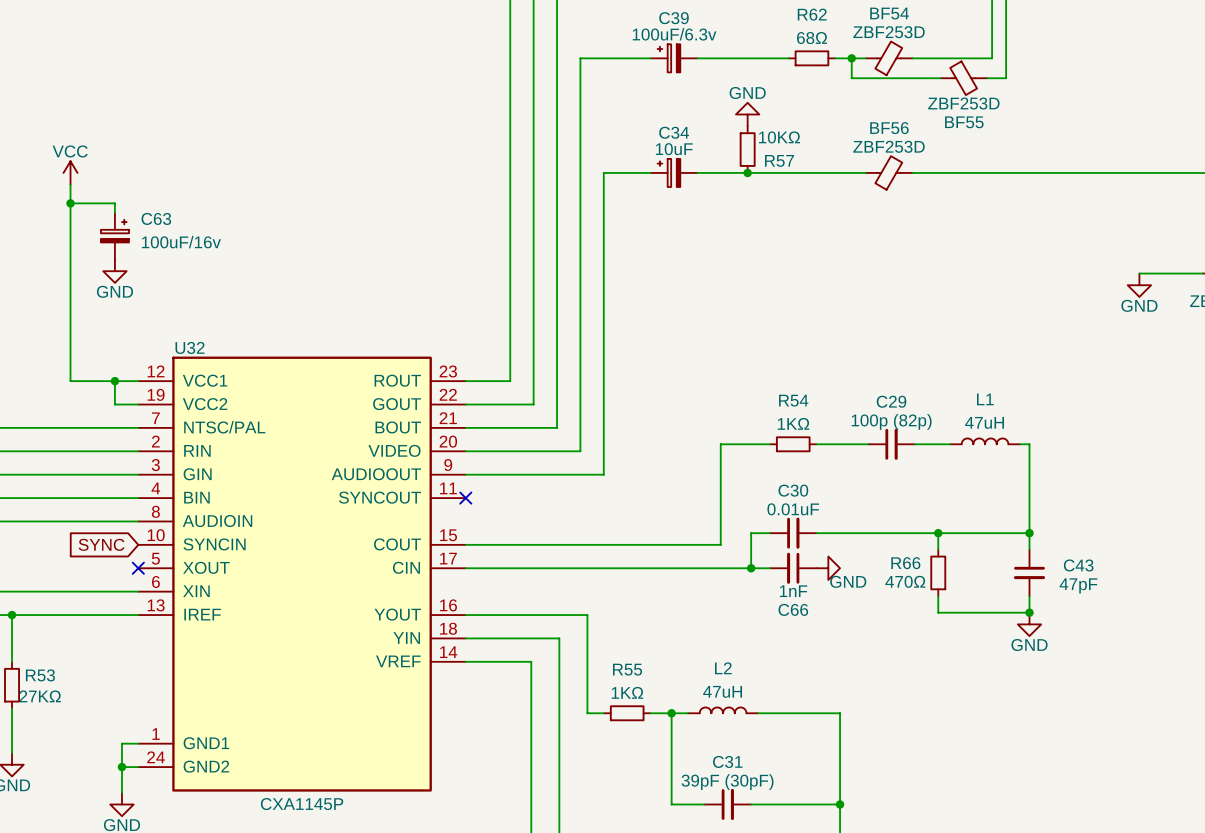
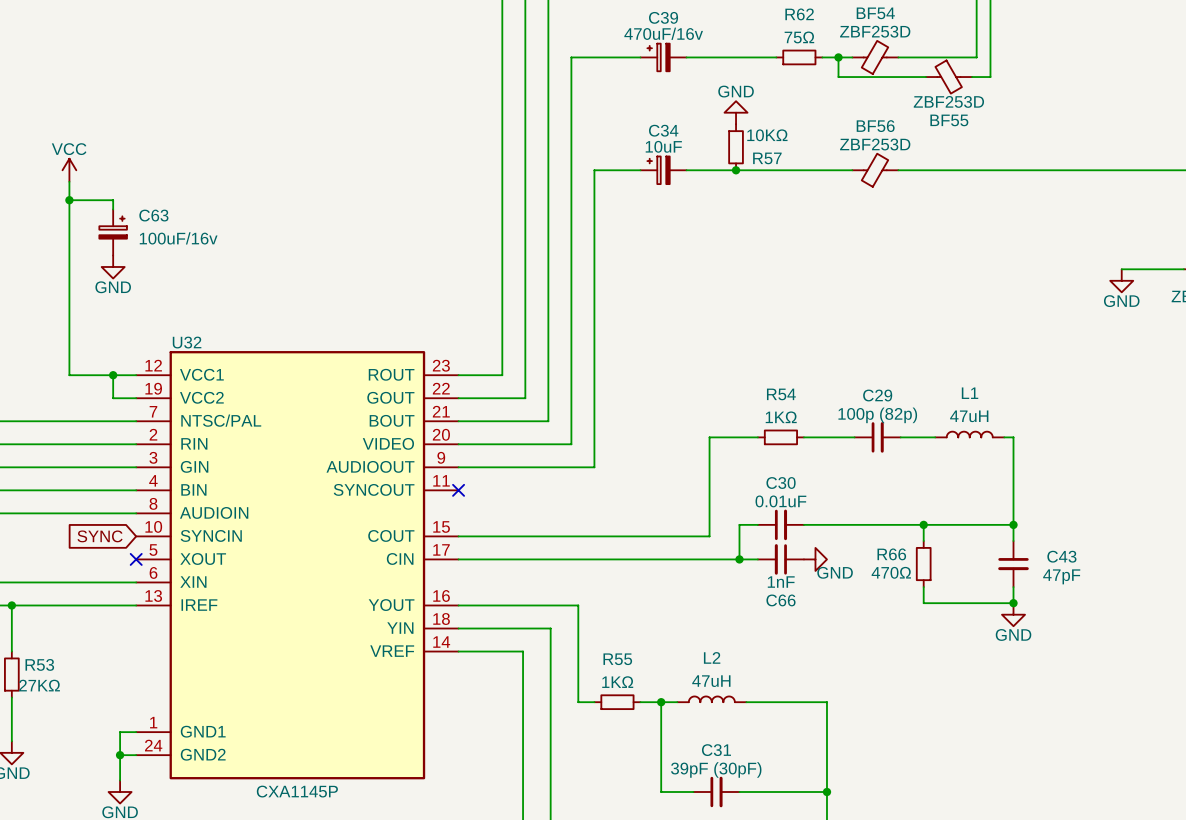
C39 value: 100uF/6.3v (674, 34) -> 470uF/16v (663, 33)
R62 value: 68Ω (812, 38) -> 75Ω (799, 37)

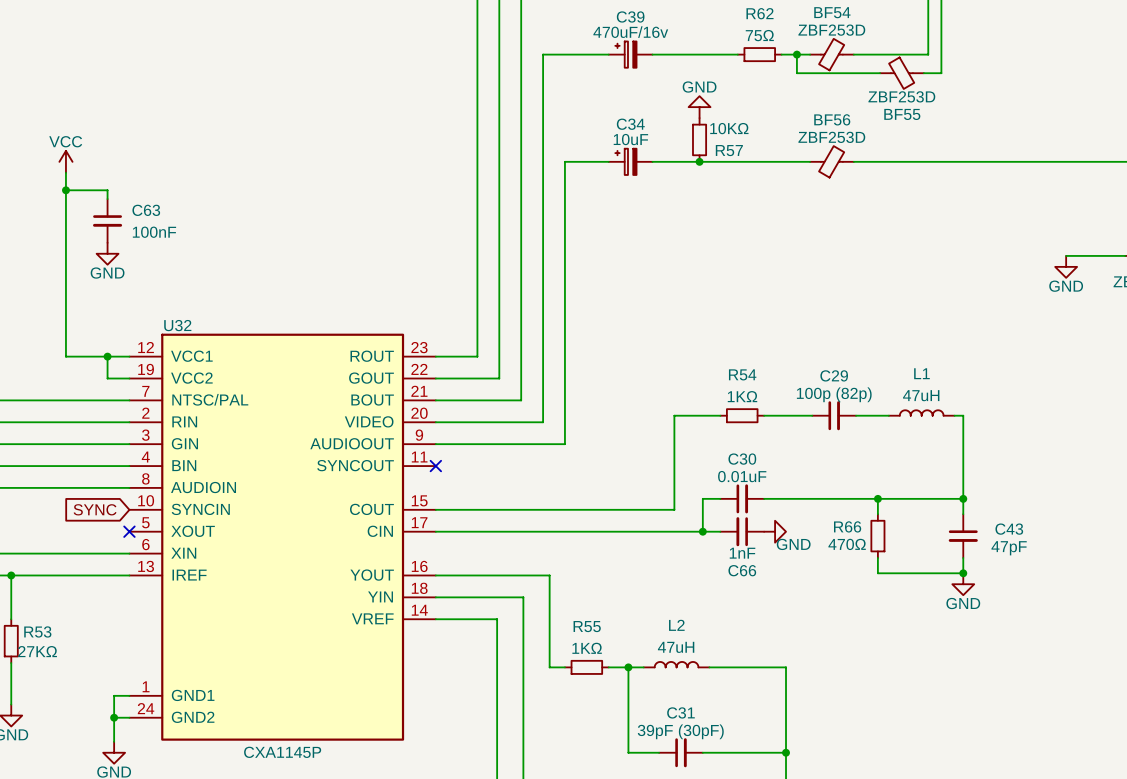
C63 symbol: [99, 209, 127, 256] -> [93, 199, 123, 243]
C63 value: 100uF/16v (178, 238) -> 100nF (154, 232)

